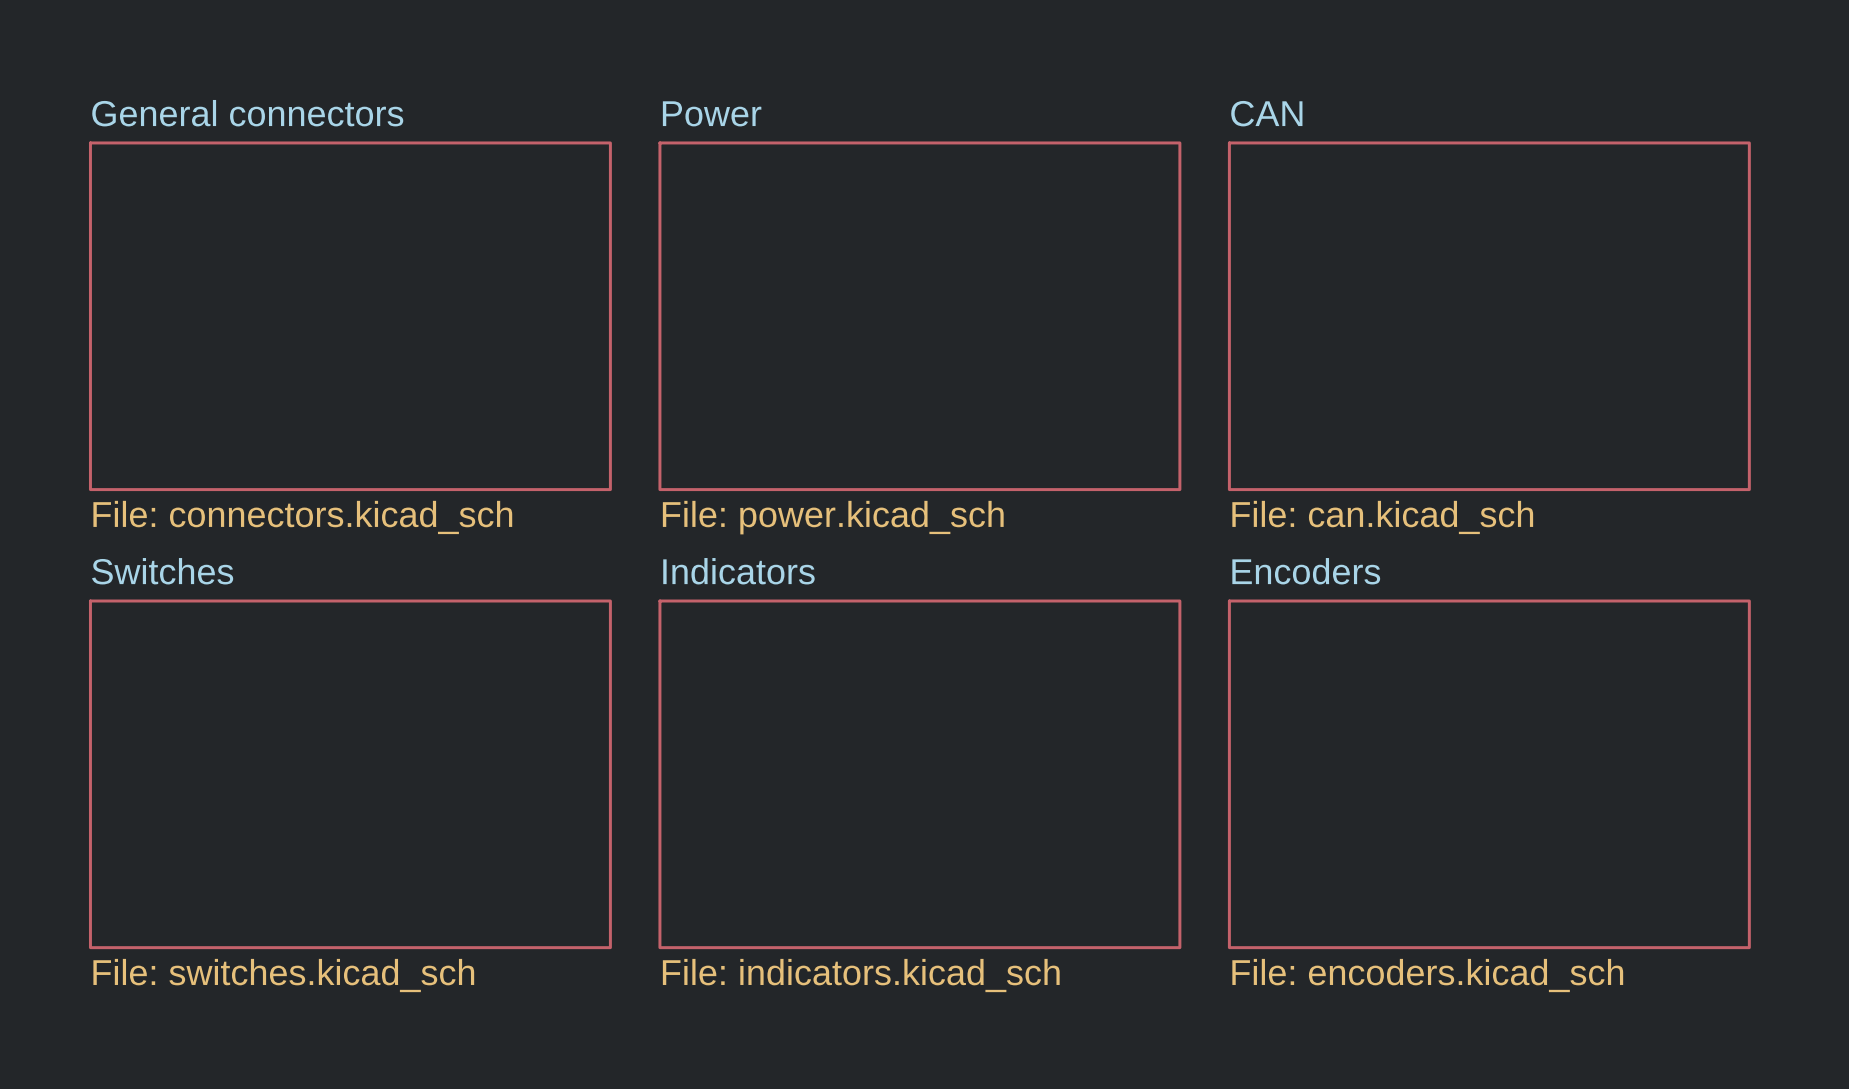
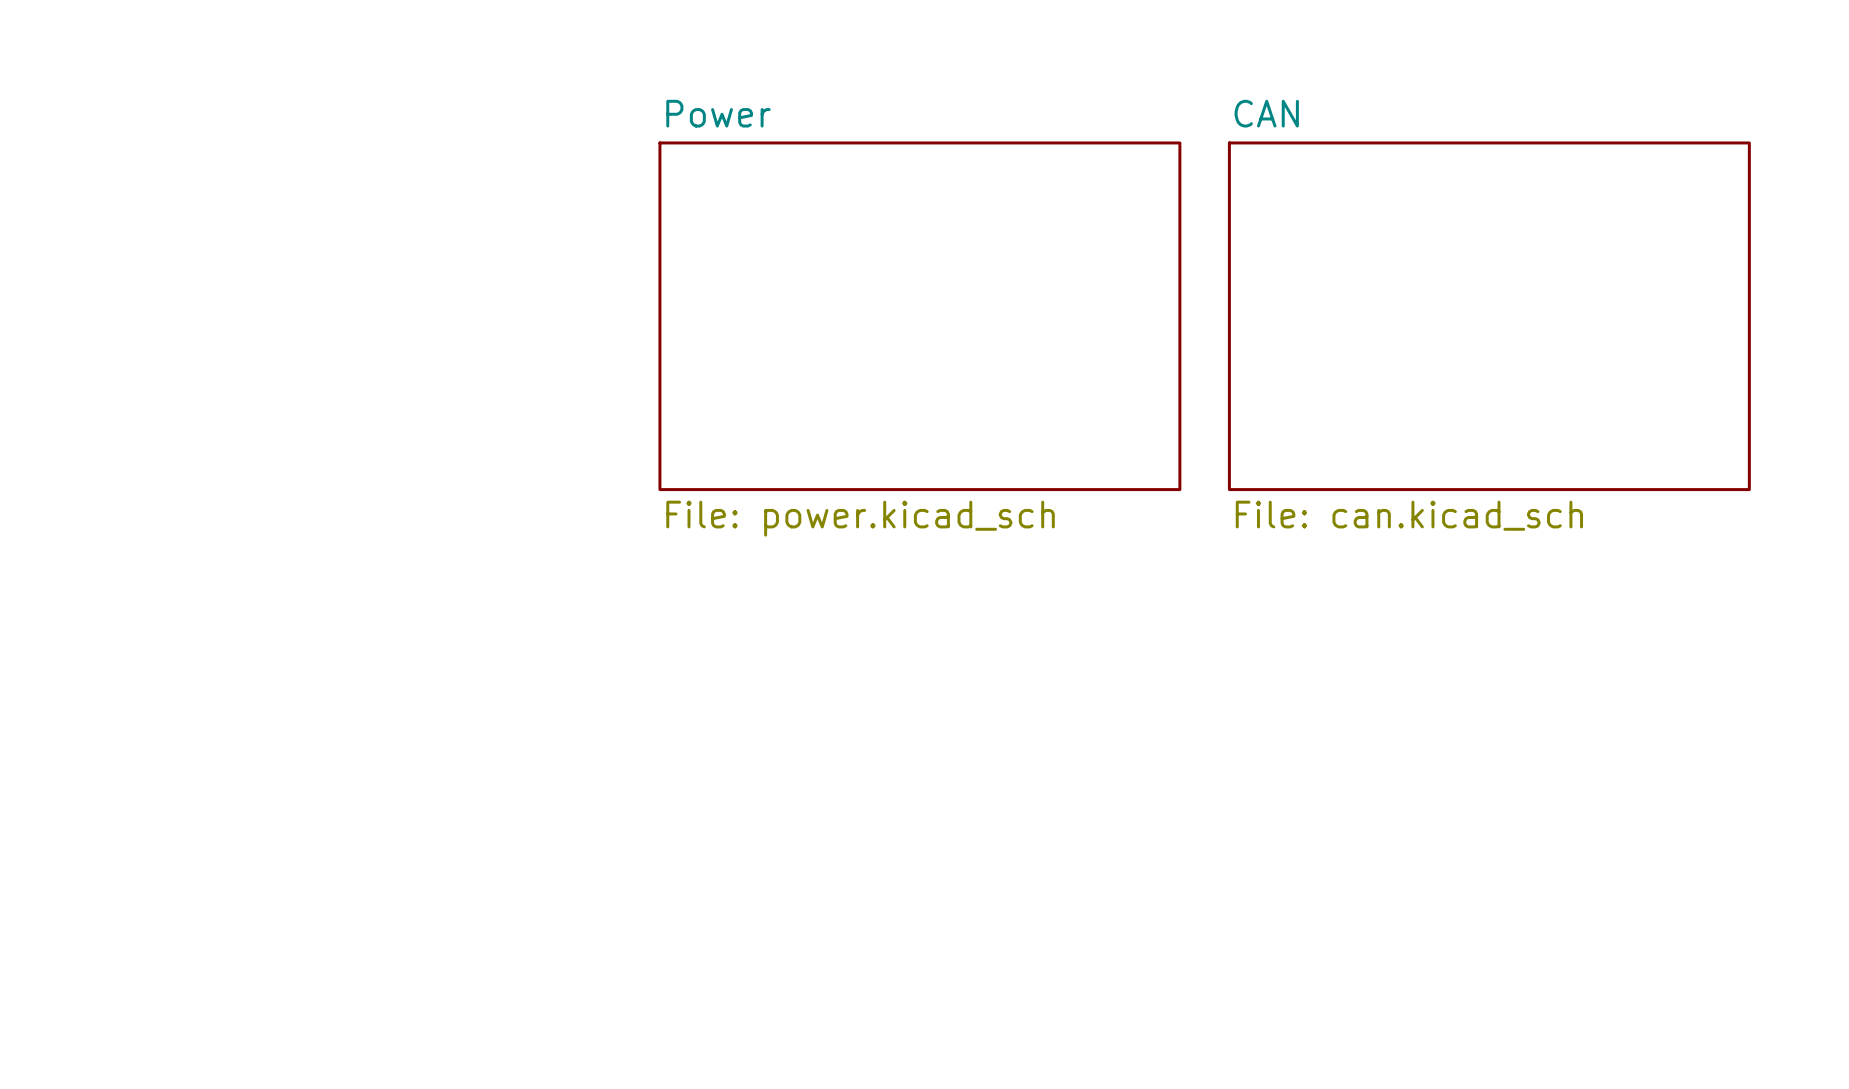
sheet General connectors: File: connectors.kicad_sch (350, 316) -> none
sheet Switches: File: switches.kicad_sch (350, 774) -> none
sheet Indicators: File: indicators.kicad_sch (919, 774) -> none
sheet Encoders: File: encoders.kicad_sch (1489, 774) -> none

